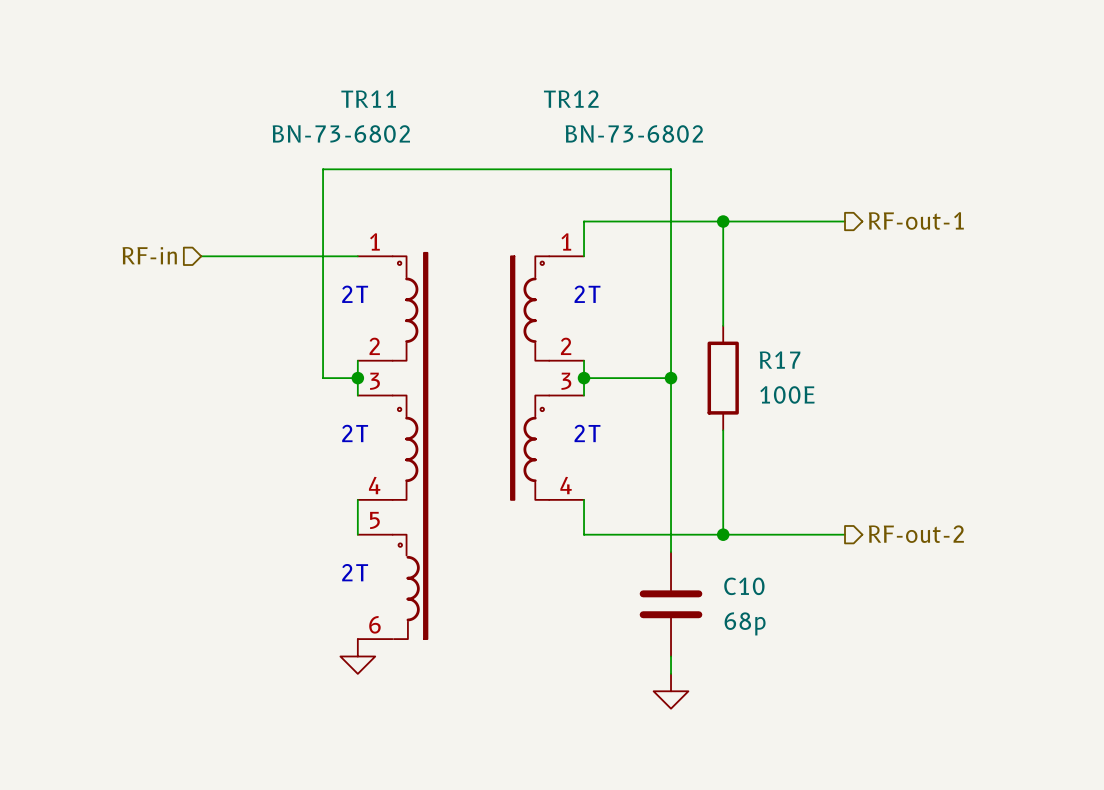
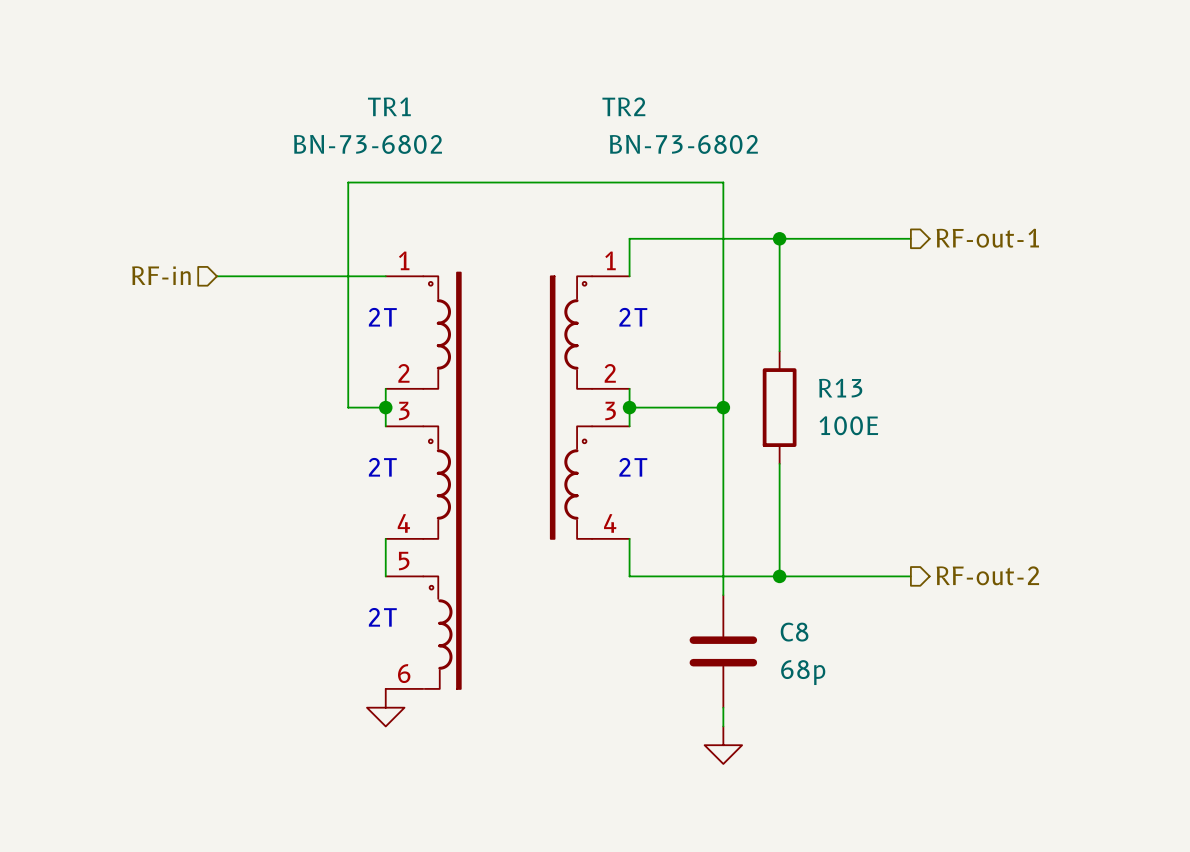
TR11 name: TR11 (368, 99) -> TR1 (389, 106)
TR12 name: TR12 (571, 99) -> TR2 (623, 106)
R17 name: R17 (780, 360) -> R13 (840, 388)
C10 name: C10 (744, 586) -> C8 (794, 632)

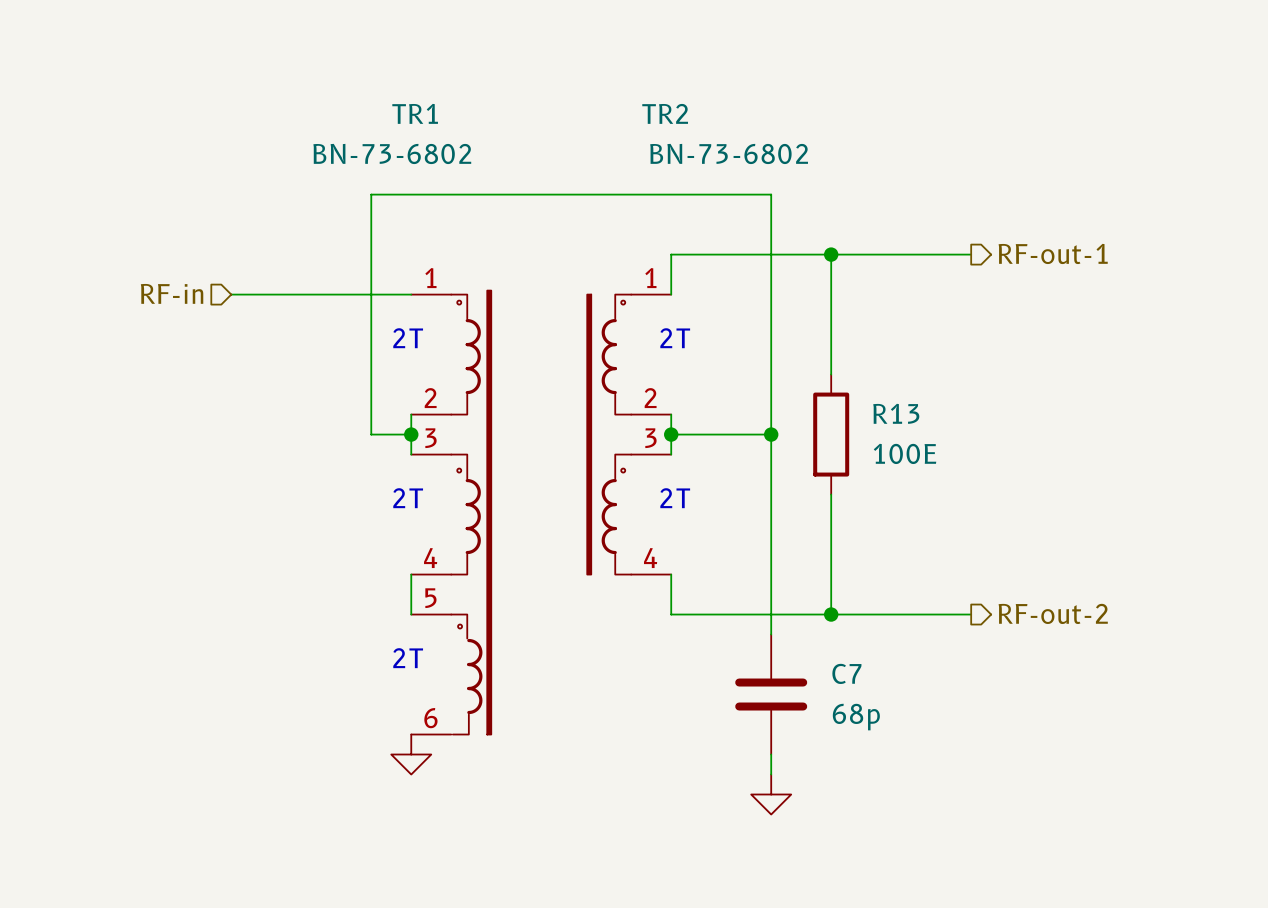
C8 name: C8 (794, 632) -> C7 (846, 673)

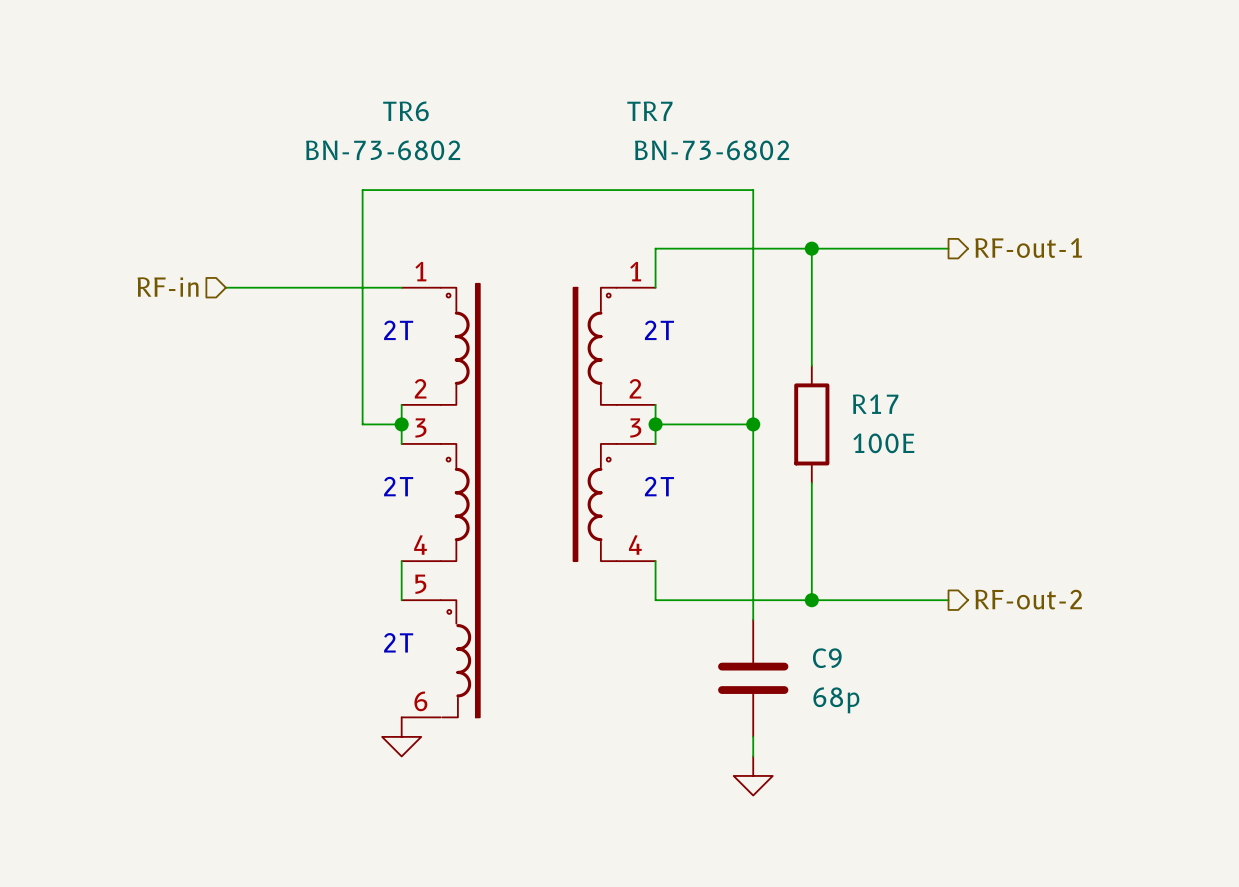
TR1 name: TR1 (415, 113) -> TR6 (405, 111)
TR2 name: TR2 (665, 113) -> TR7 (649, 111)
R13 name: R13 (896, 413) -> R17 (875, 404)
C7 name: C7 (846, 673) -> C9 (827, 658)

